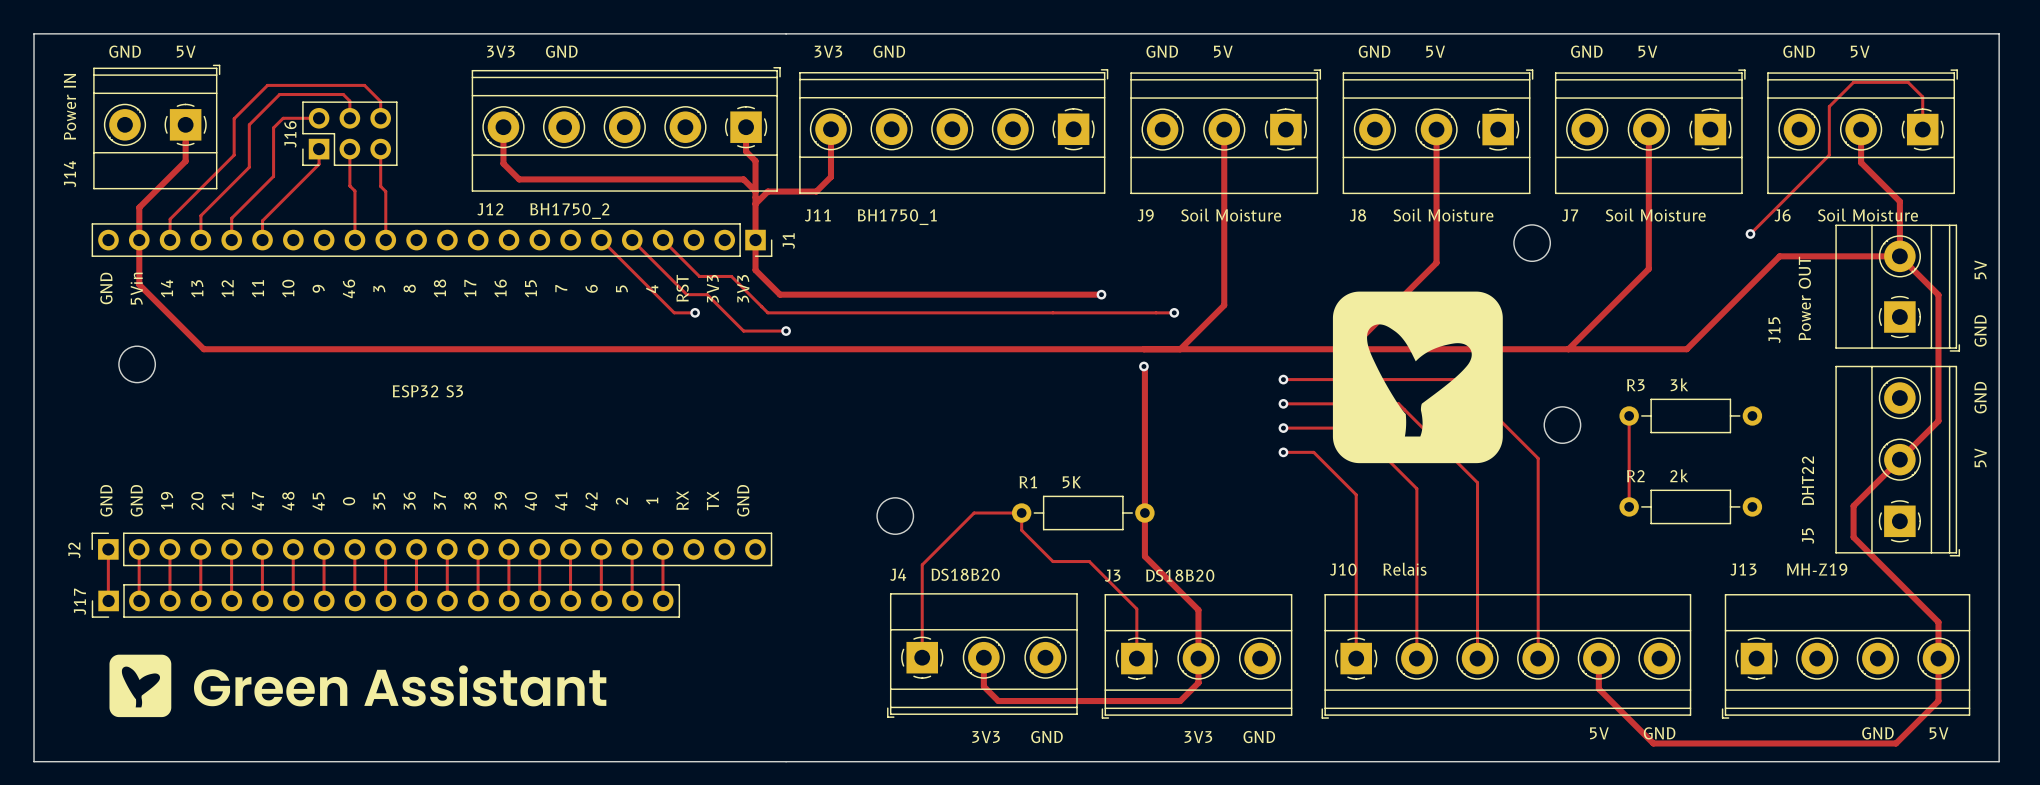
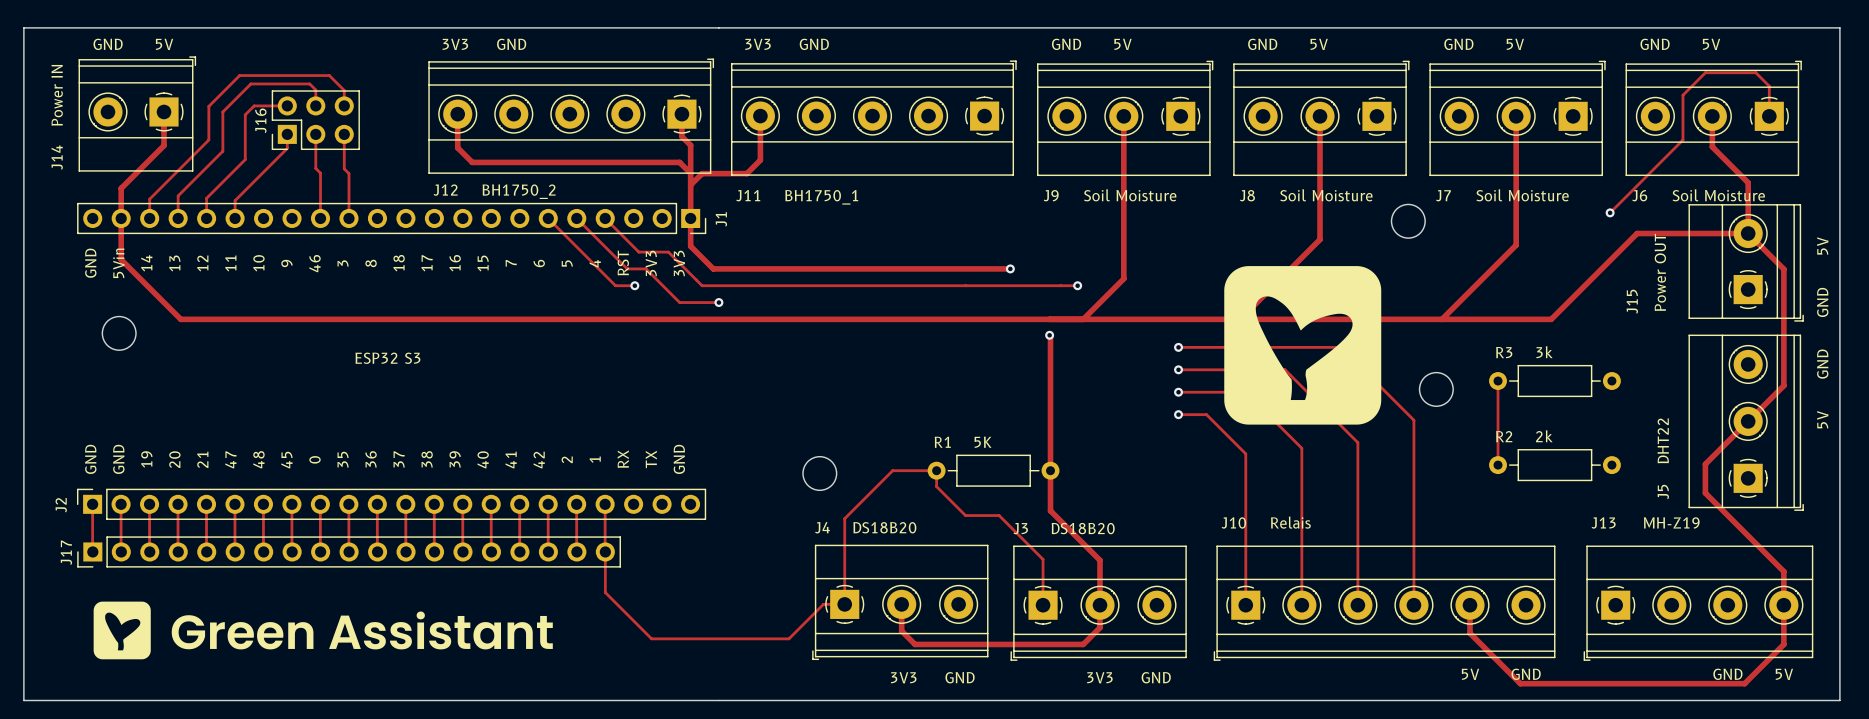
track: none -> (605, 551) (605, 592) (651, 638) (788, 638) (823, 604) (844, 604)

